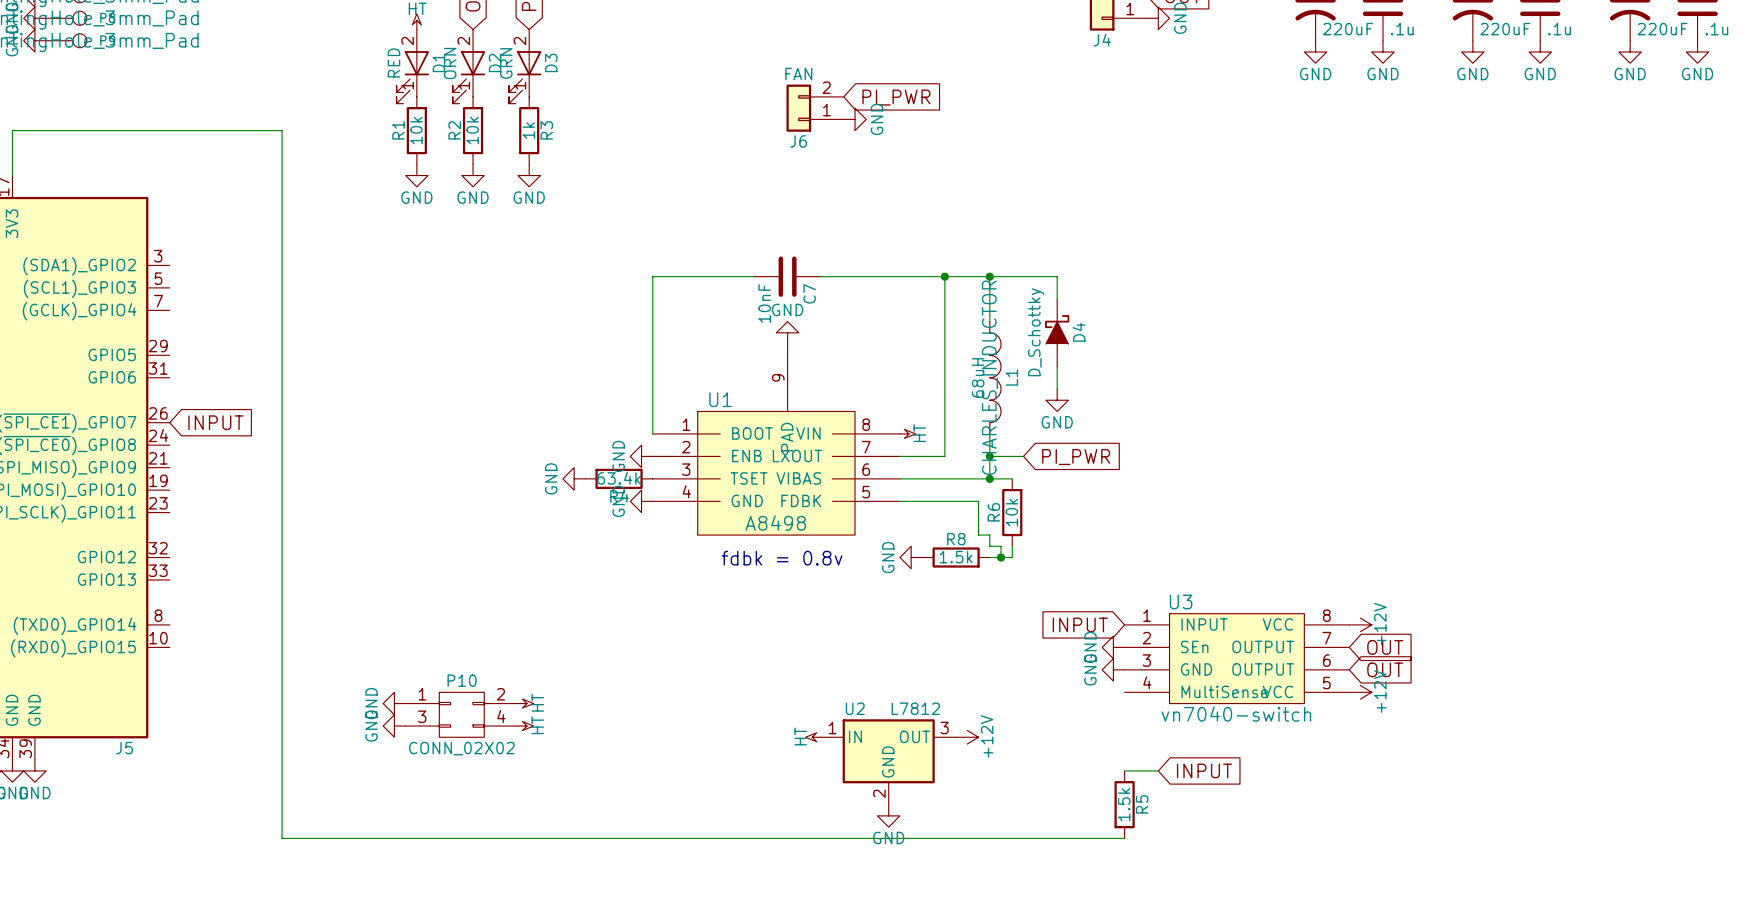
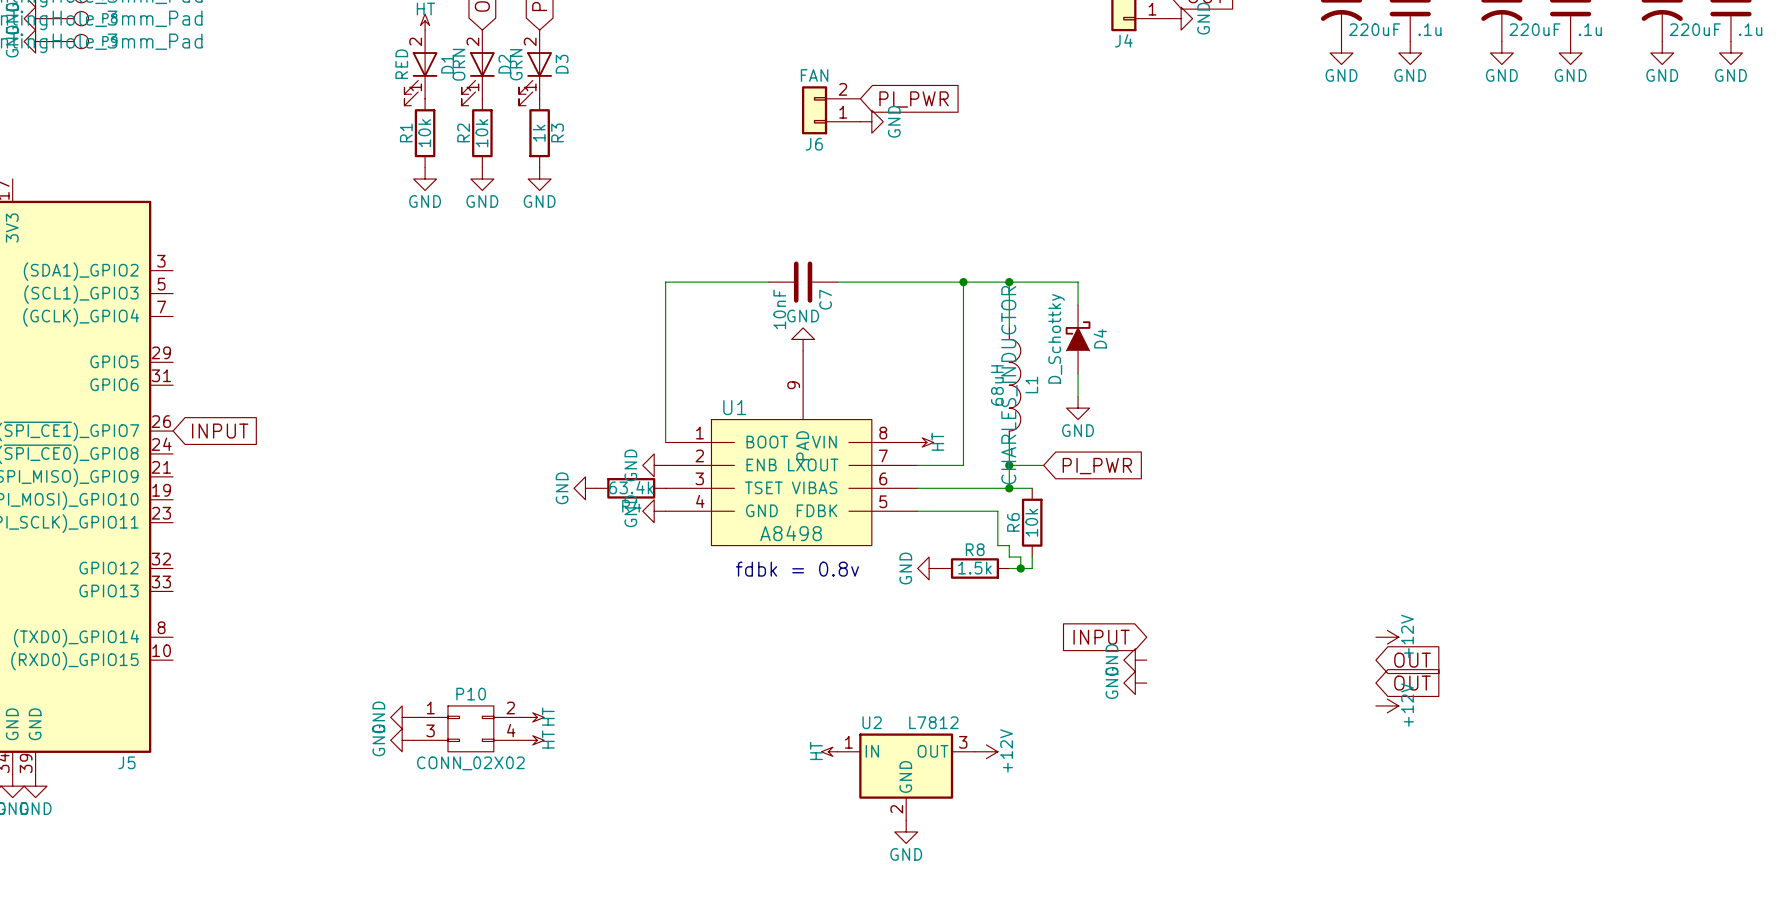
wire: (12, 175) (12, 130) (282, 130) (282, 838) (1124, 838) -> none
U3: vn7040-switch (1236, 658) -> none
wire: (1124, 770) (1158, 770) -> none
global label: INPUT (1204, 770) -> none
R5: 1.5k (1124, 804) -> none

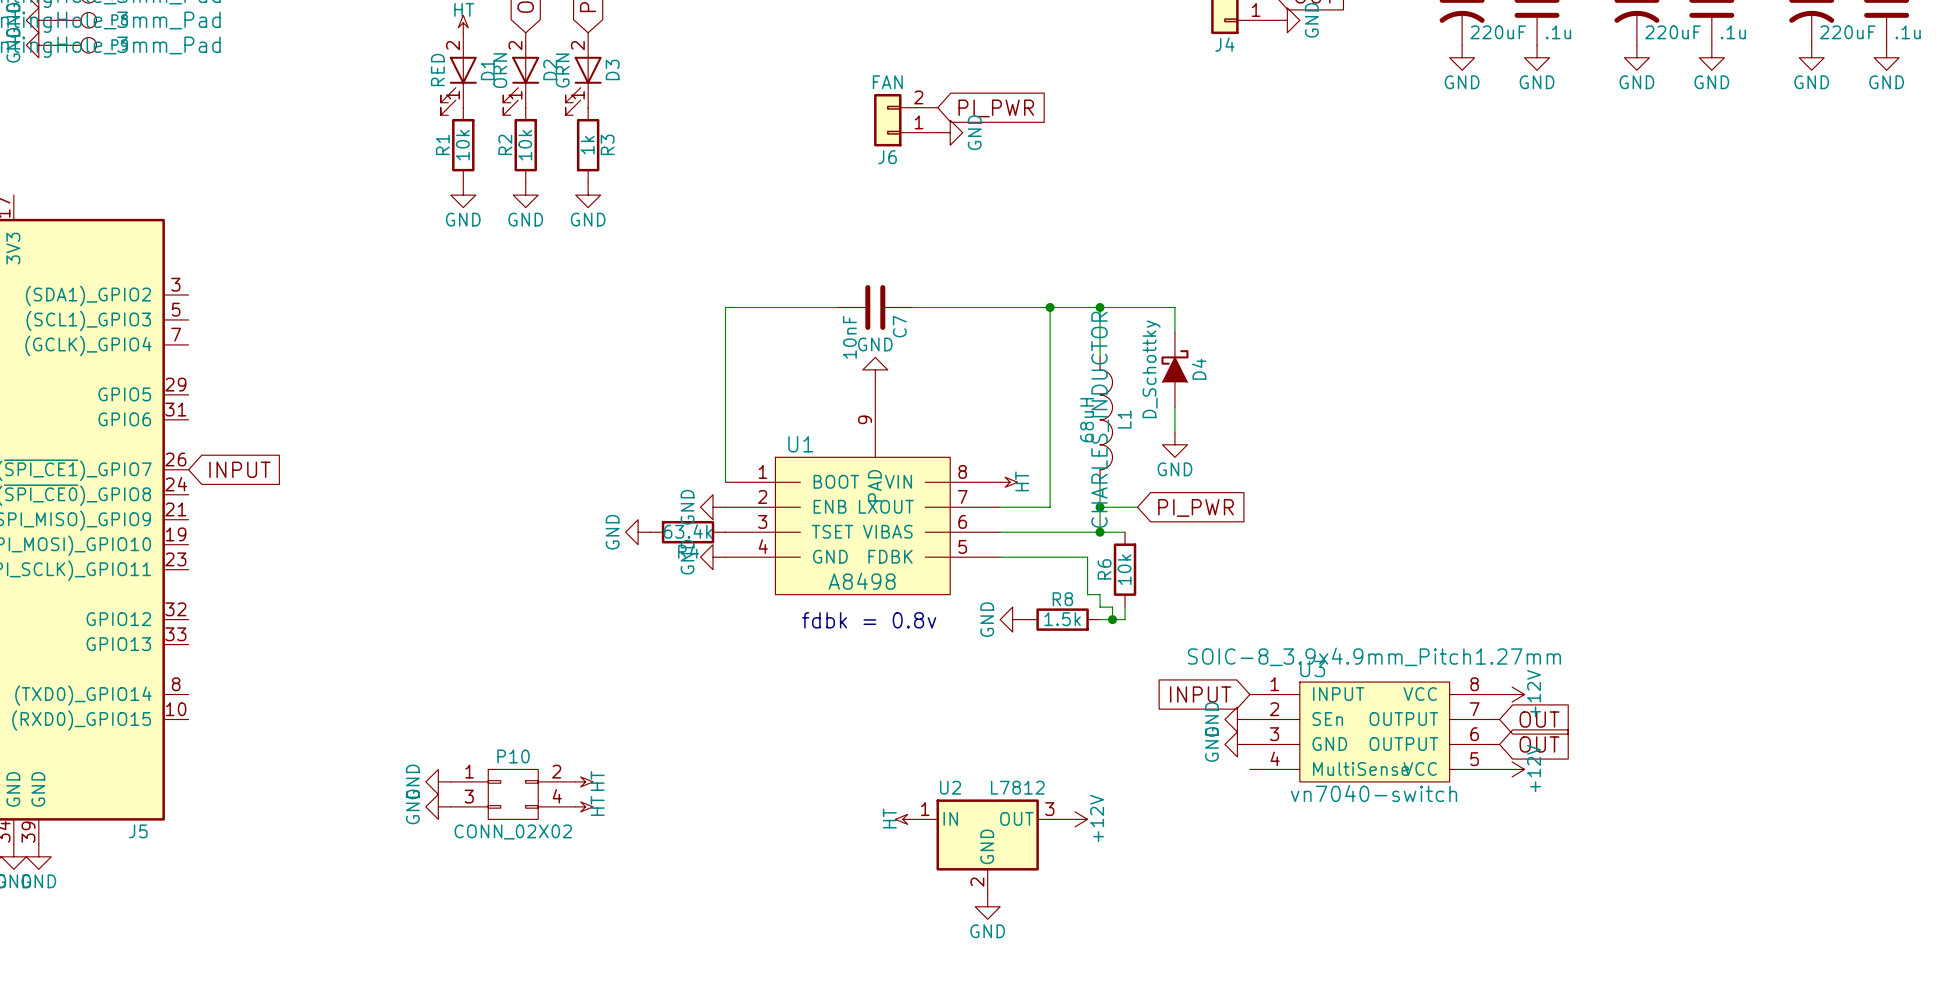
U3: none -> vn7040-switch (1374, 731)

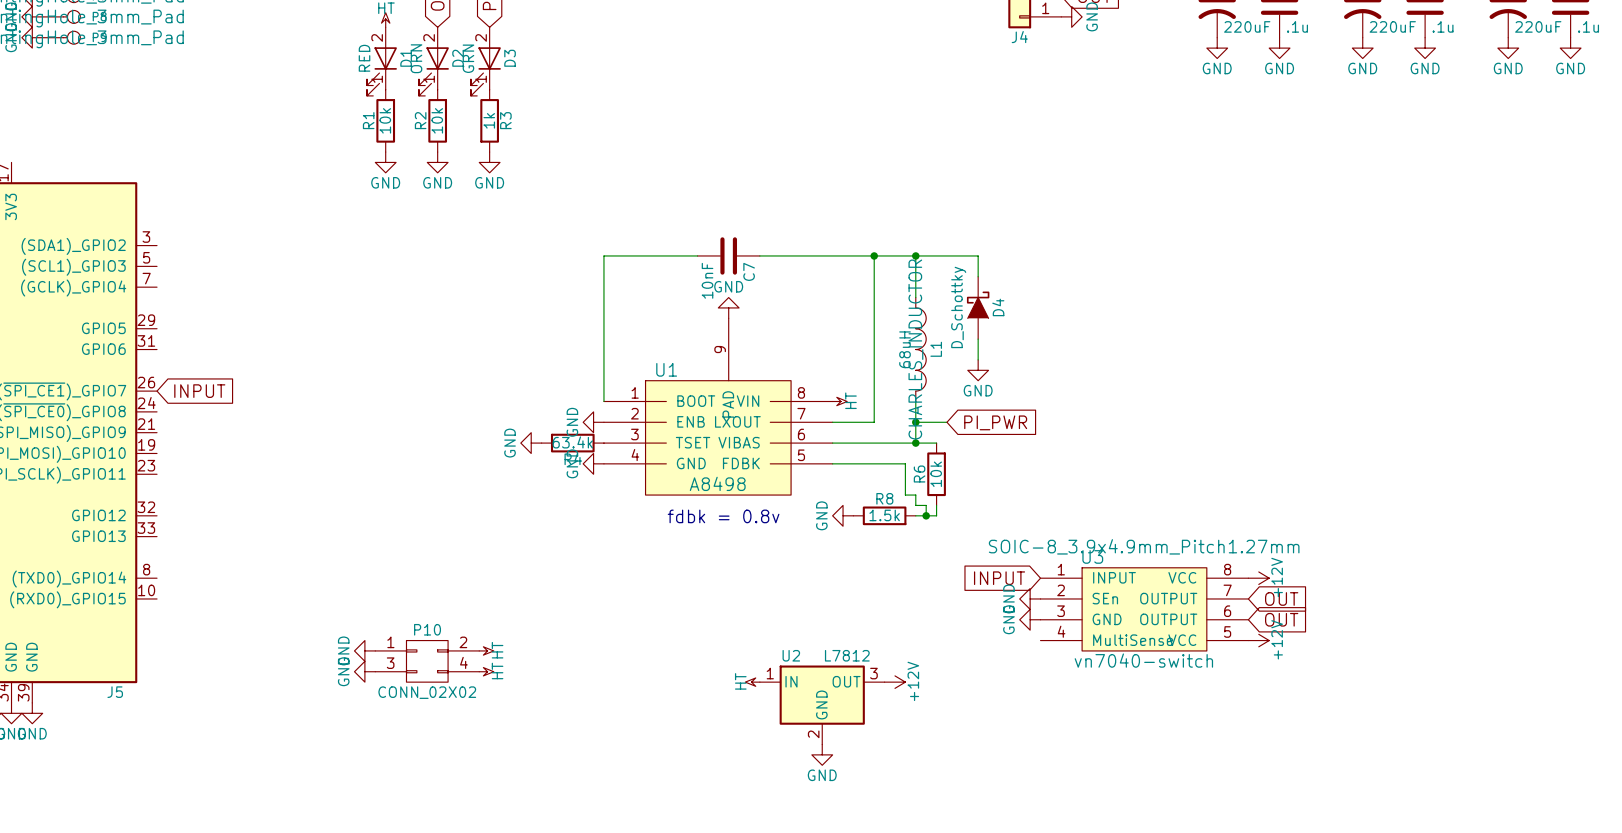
global label: PI_PWR (996, 108) -> none
J6: FAN (905, 120) -> none
power symbol: GND (950, 132) -> none

